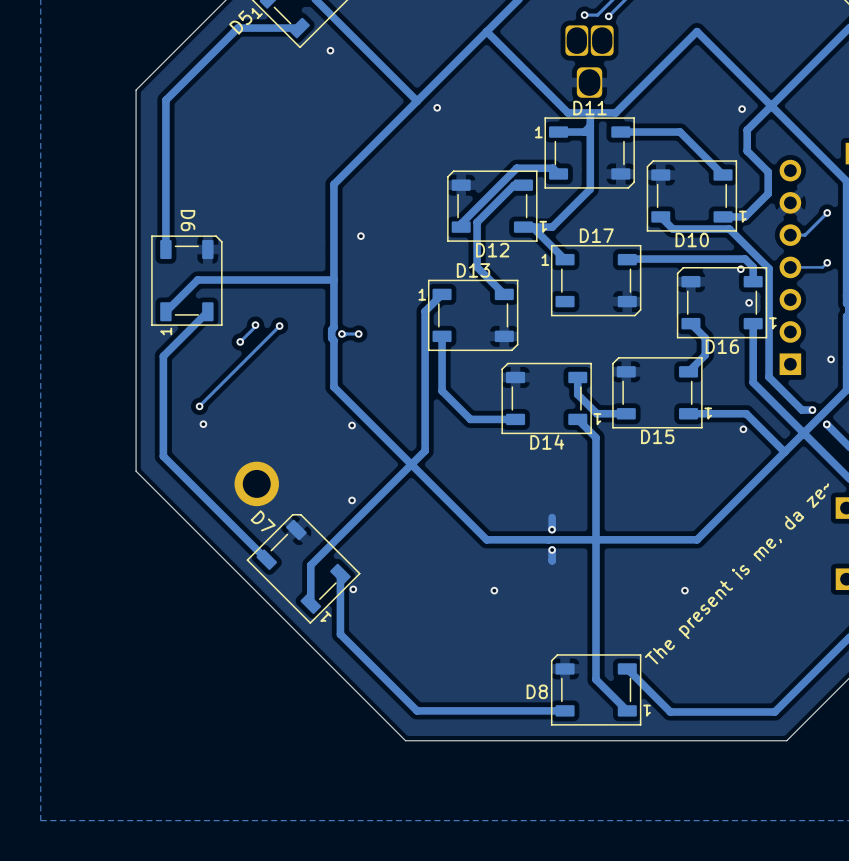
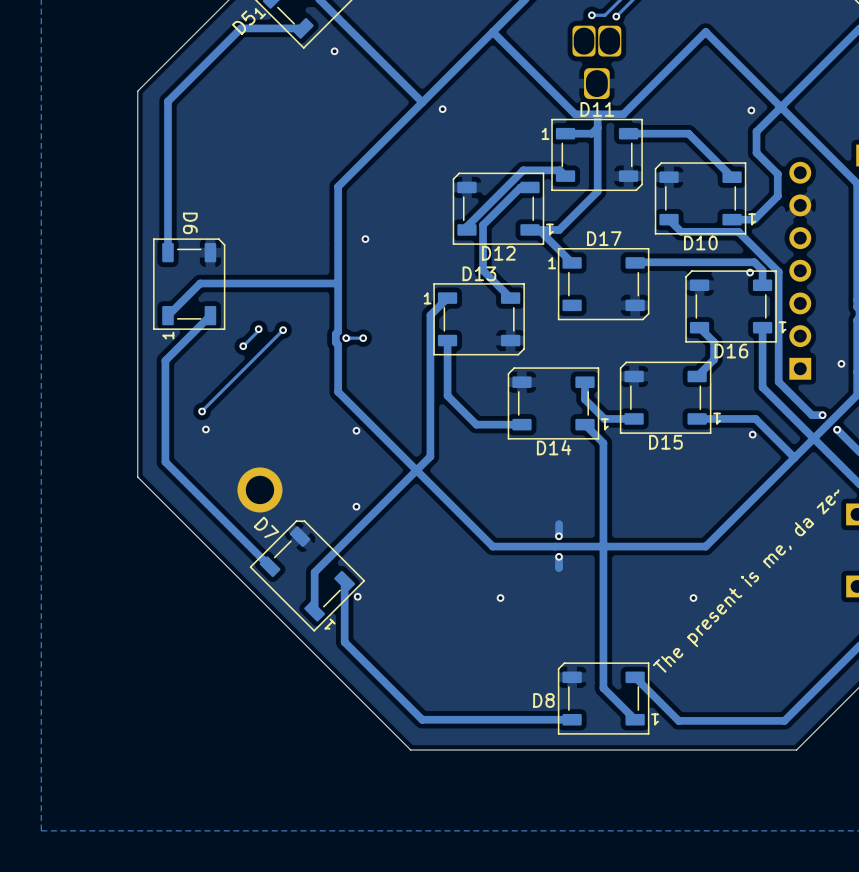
track: (827, 212) (805, 235) (790, 235) -> none
via: (827, 212) -> none
track: (827, 262) (822, 267) (790, 267) -> none
via: (827, 262) -> none
via: (749, 302) -> none

